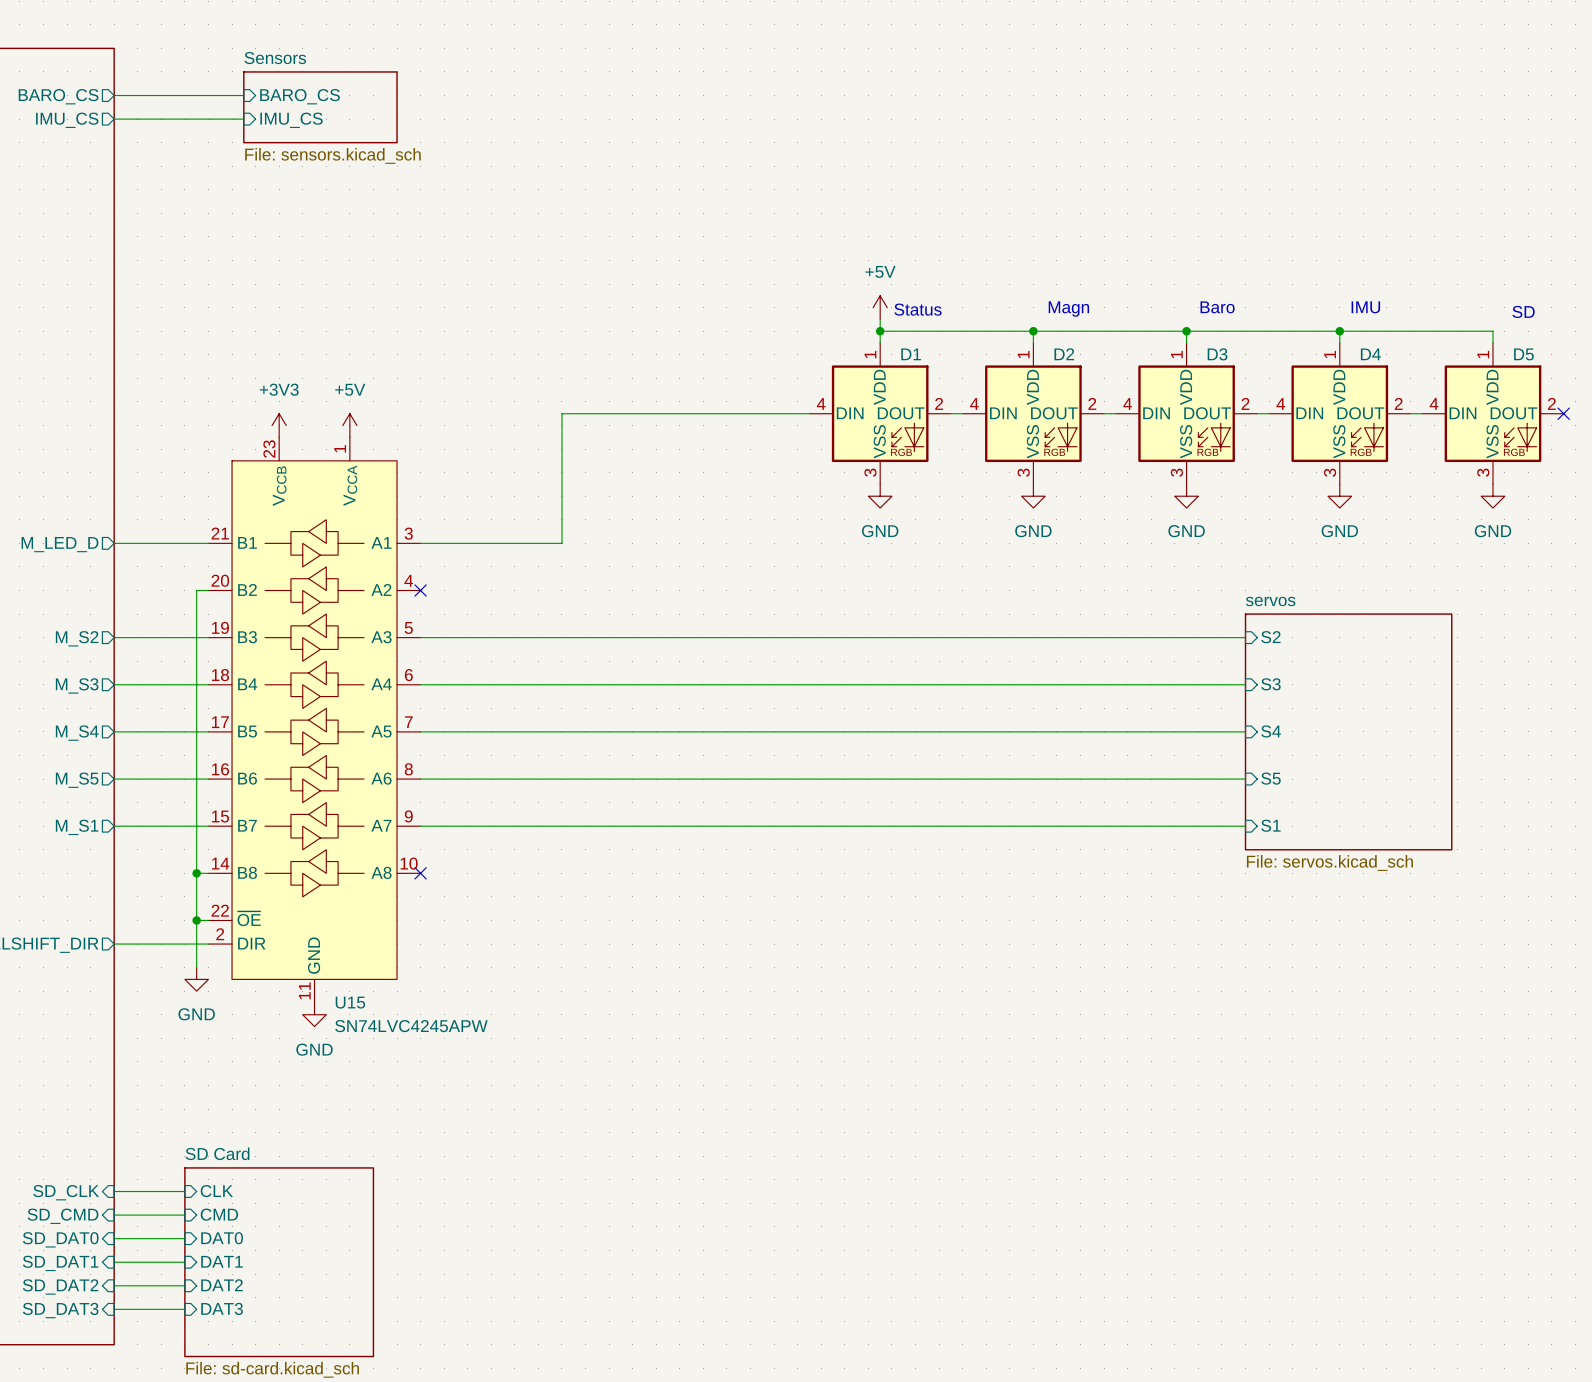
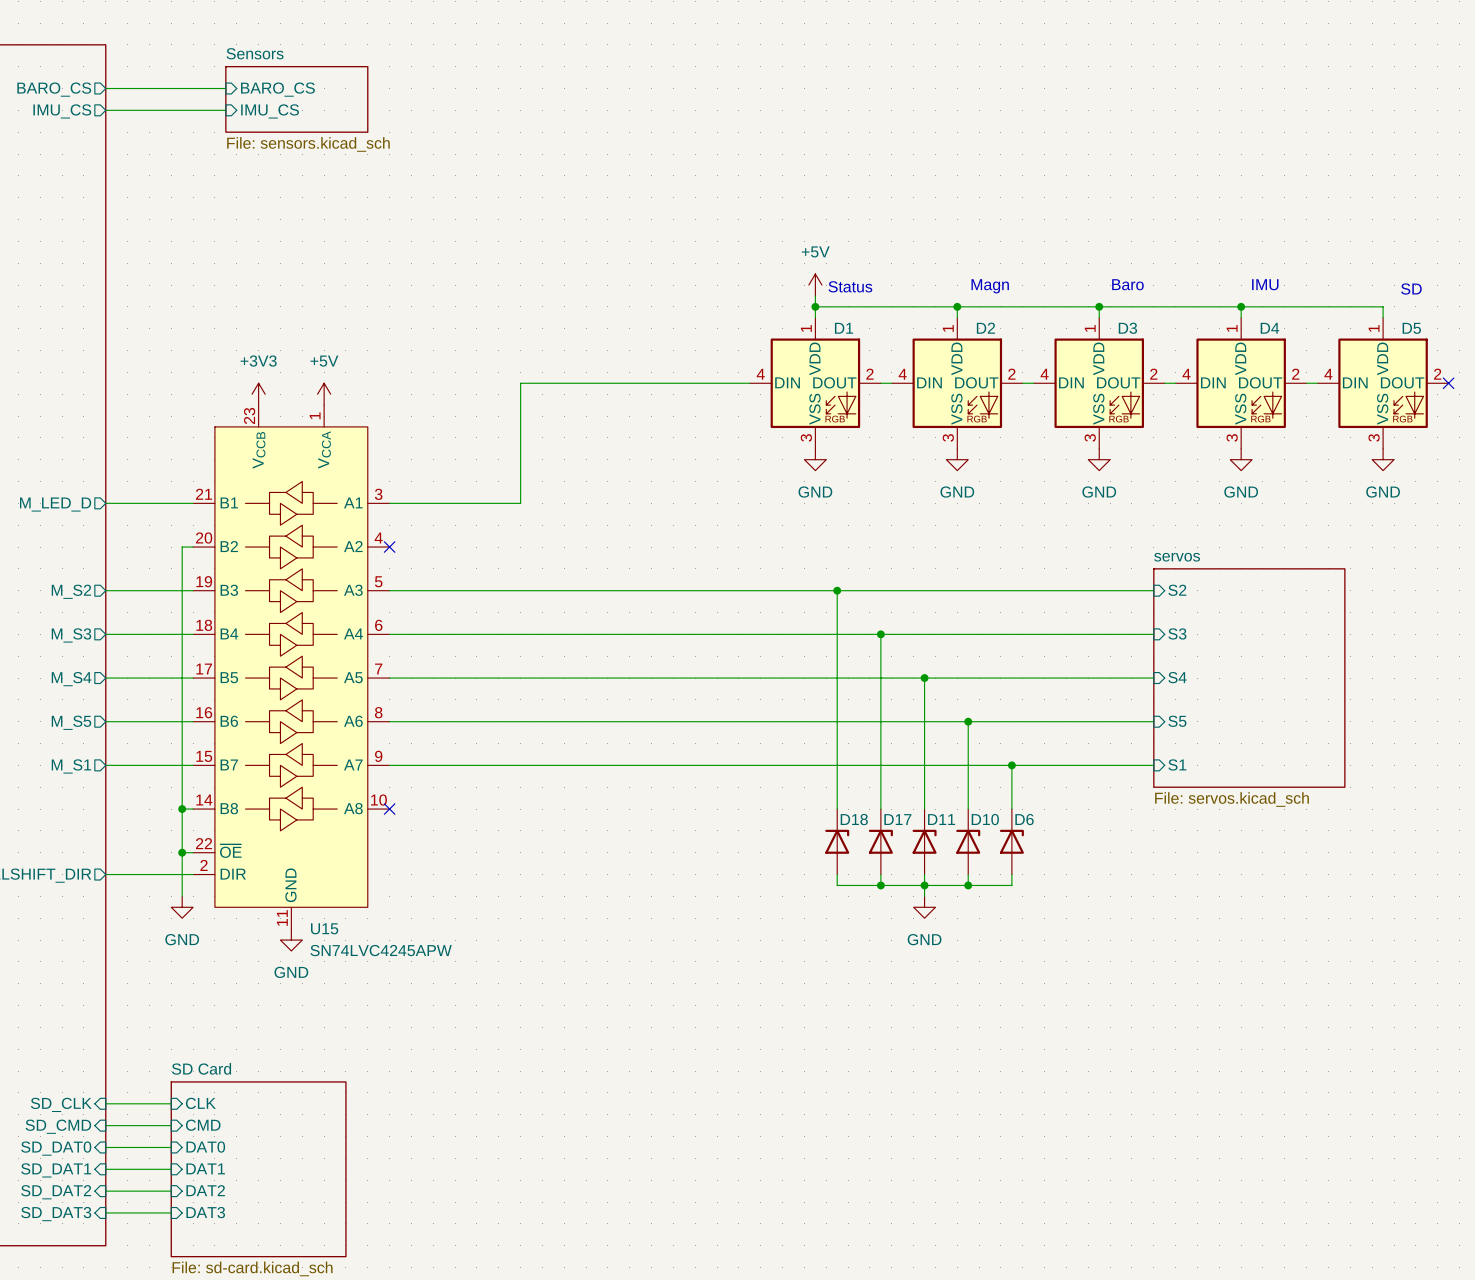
wire: none -> (837, 590) (837, 809)
junction: none -> (837, 590)
wire: none -> (880, 634) (880, 809)
junction: none -> (880, 634)
wire: none -> (924, 678) (924, 809)
junction: none -> (924, 678)
wire: none -> (968, 721) (968, 809)
junction: none -> (968, 721)
wire: none -> (1011, 765) (1011, 809)
junction: none -> (1011, 765)
D18: none -> (837, 841)
D17: none -> (880, 841)
D11: none -> (924, 841)
D10: none -> (968, 841)
D6: none -> (1011, 841)
wire: none -> (837, 874) (837, 885) (1011, 885) (1011, 874)
wire: none -> (880, 874) (880, 885)
wire: none -> (924, 874) (924, 896)
wire: none -> (968, 874) (968, 885)
junction: none -> (880, 885)
junction: none -> (924, 885)
junction: none -> (968, 885)
power symbol: none -> GND (924, 907)

